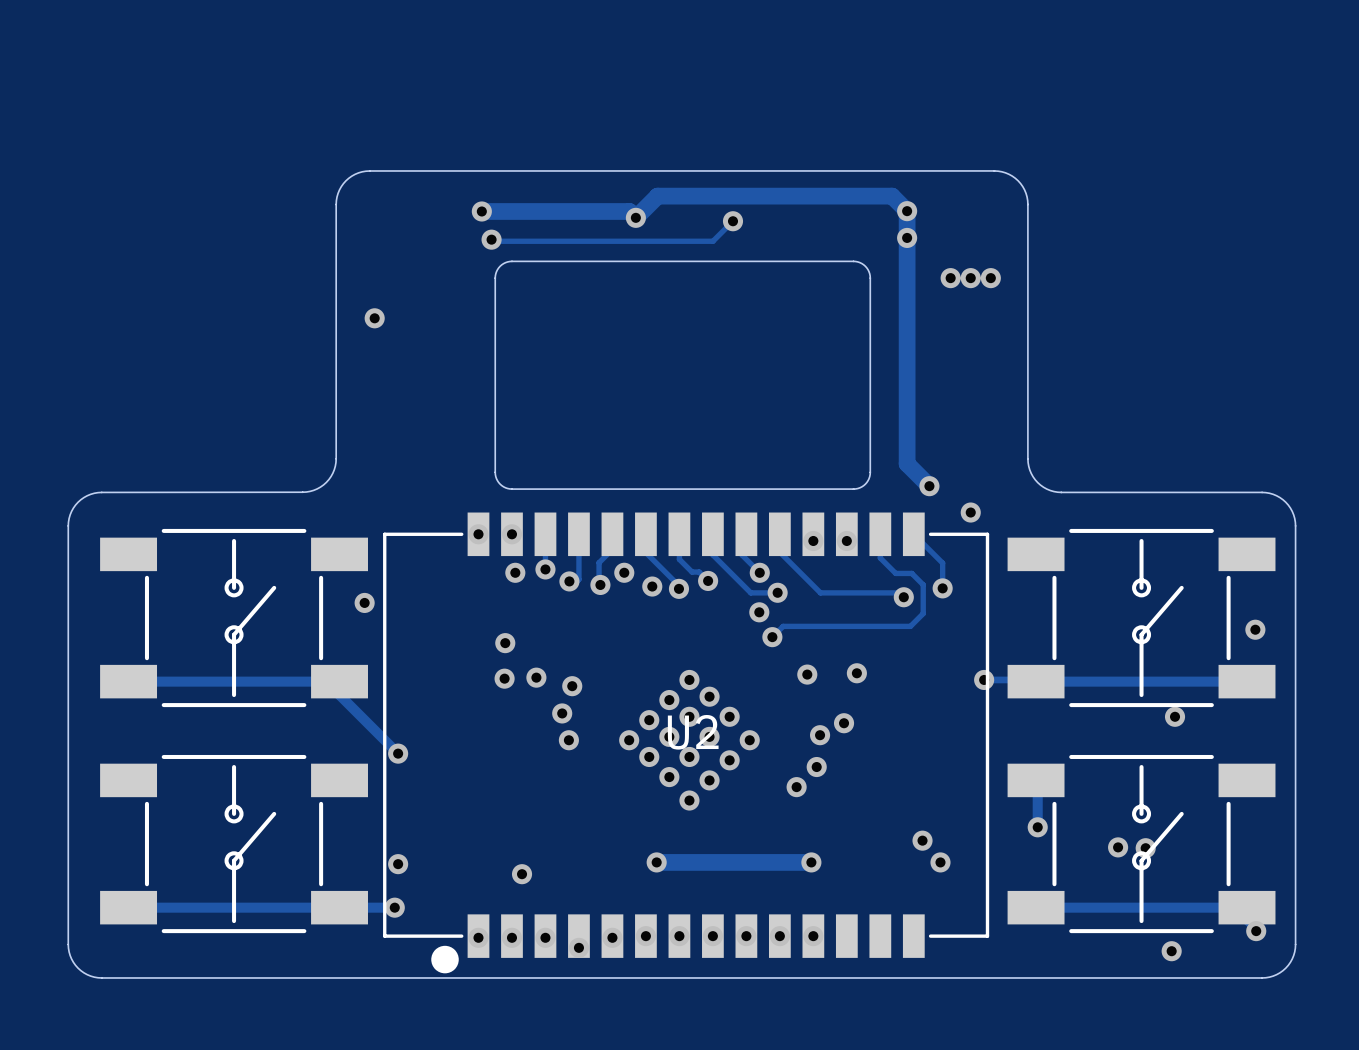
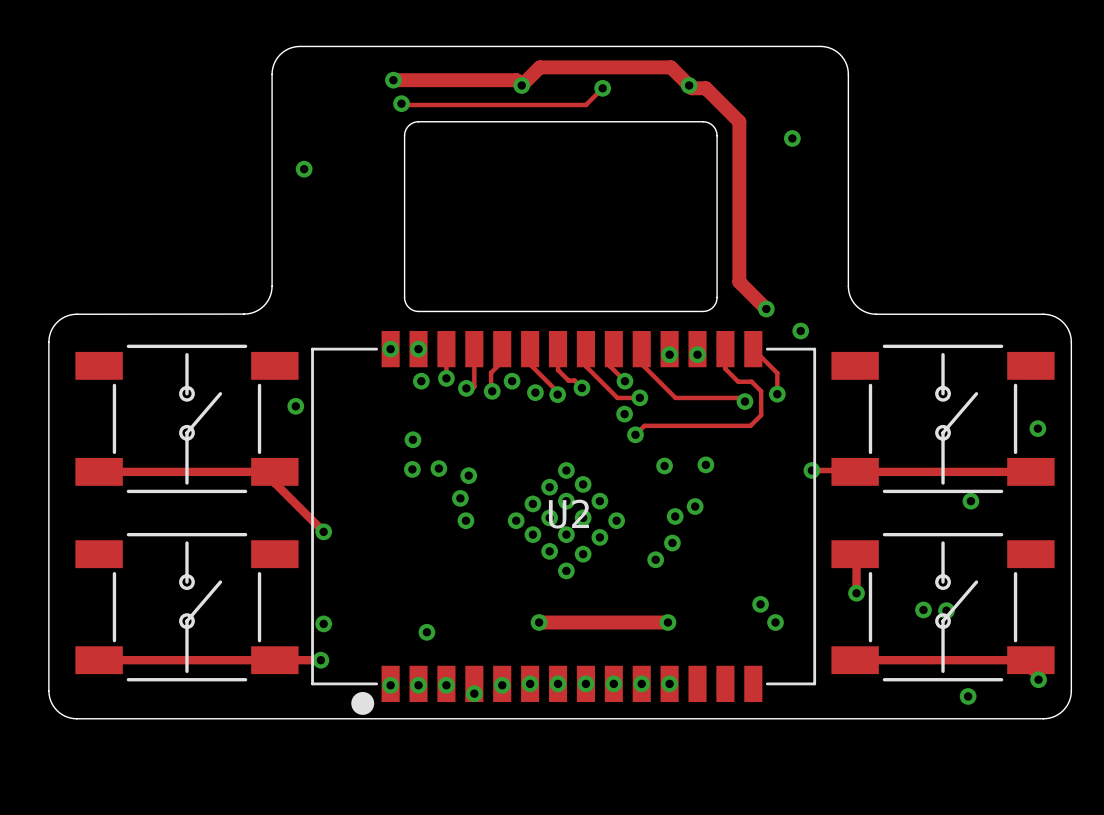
track: (657, 196) (892, 196) (907, 211) (907, 463) -> (539, 67) (671, 67) (691, 88) (705, 88) (739, 121) (739, 282) (747, 290)
via: (907, 211) -> none
via: none -> (689, 85)
via: (907, 237) -> none
via: (950, 278) -> none
via: (970, 278) -> none
via: (990, 278) -> none
via: none -> (792, 138)

